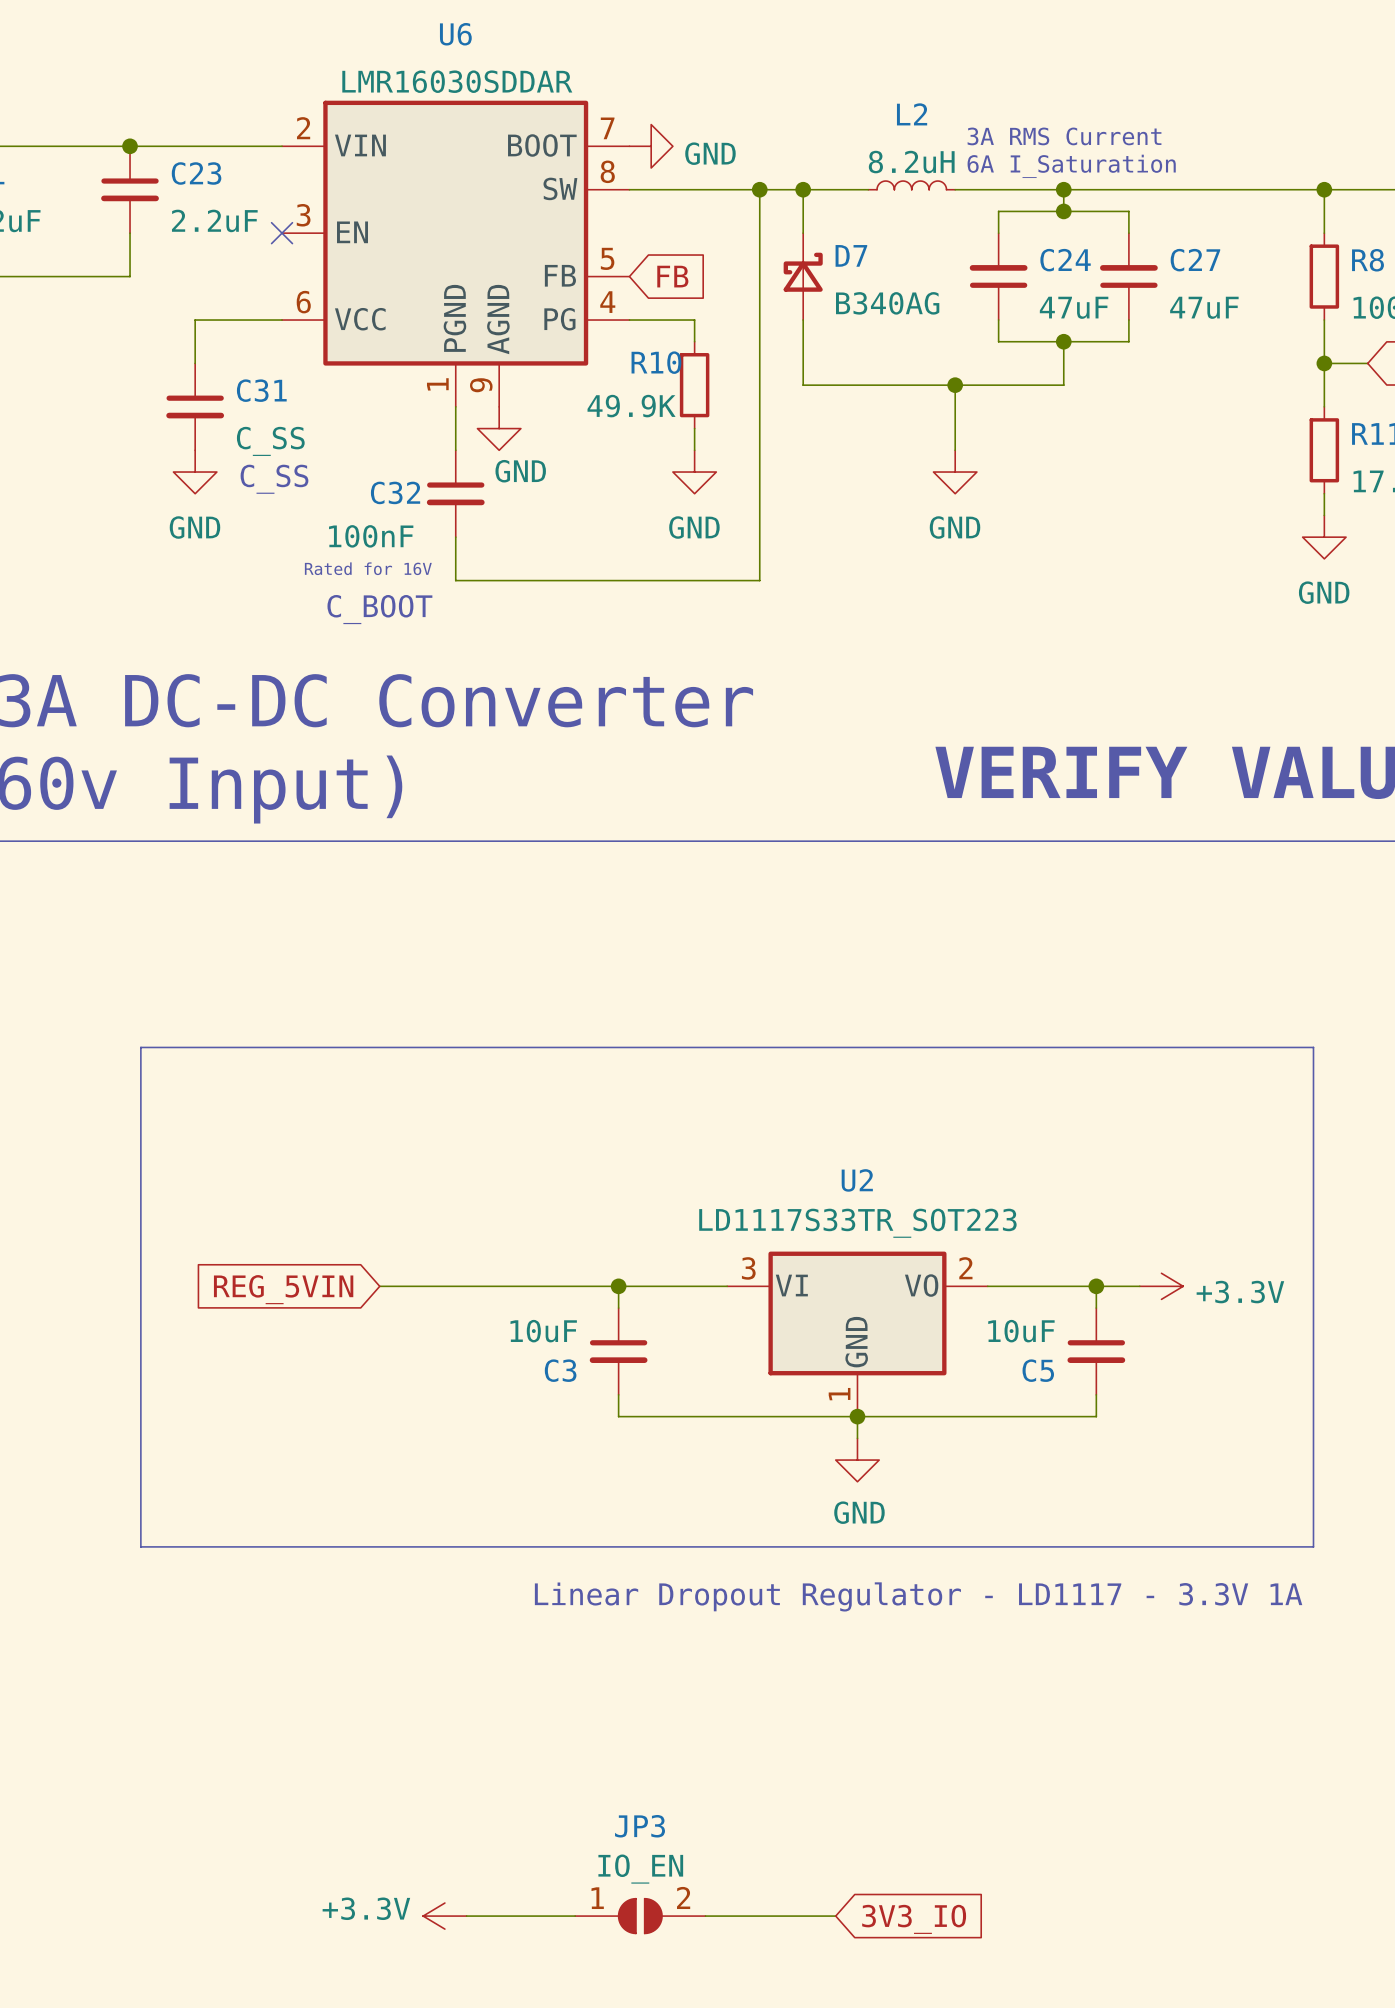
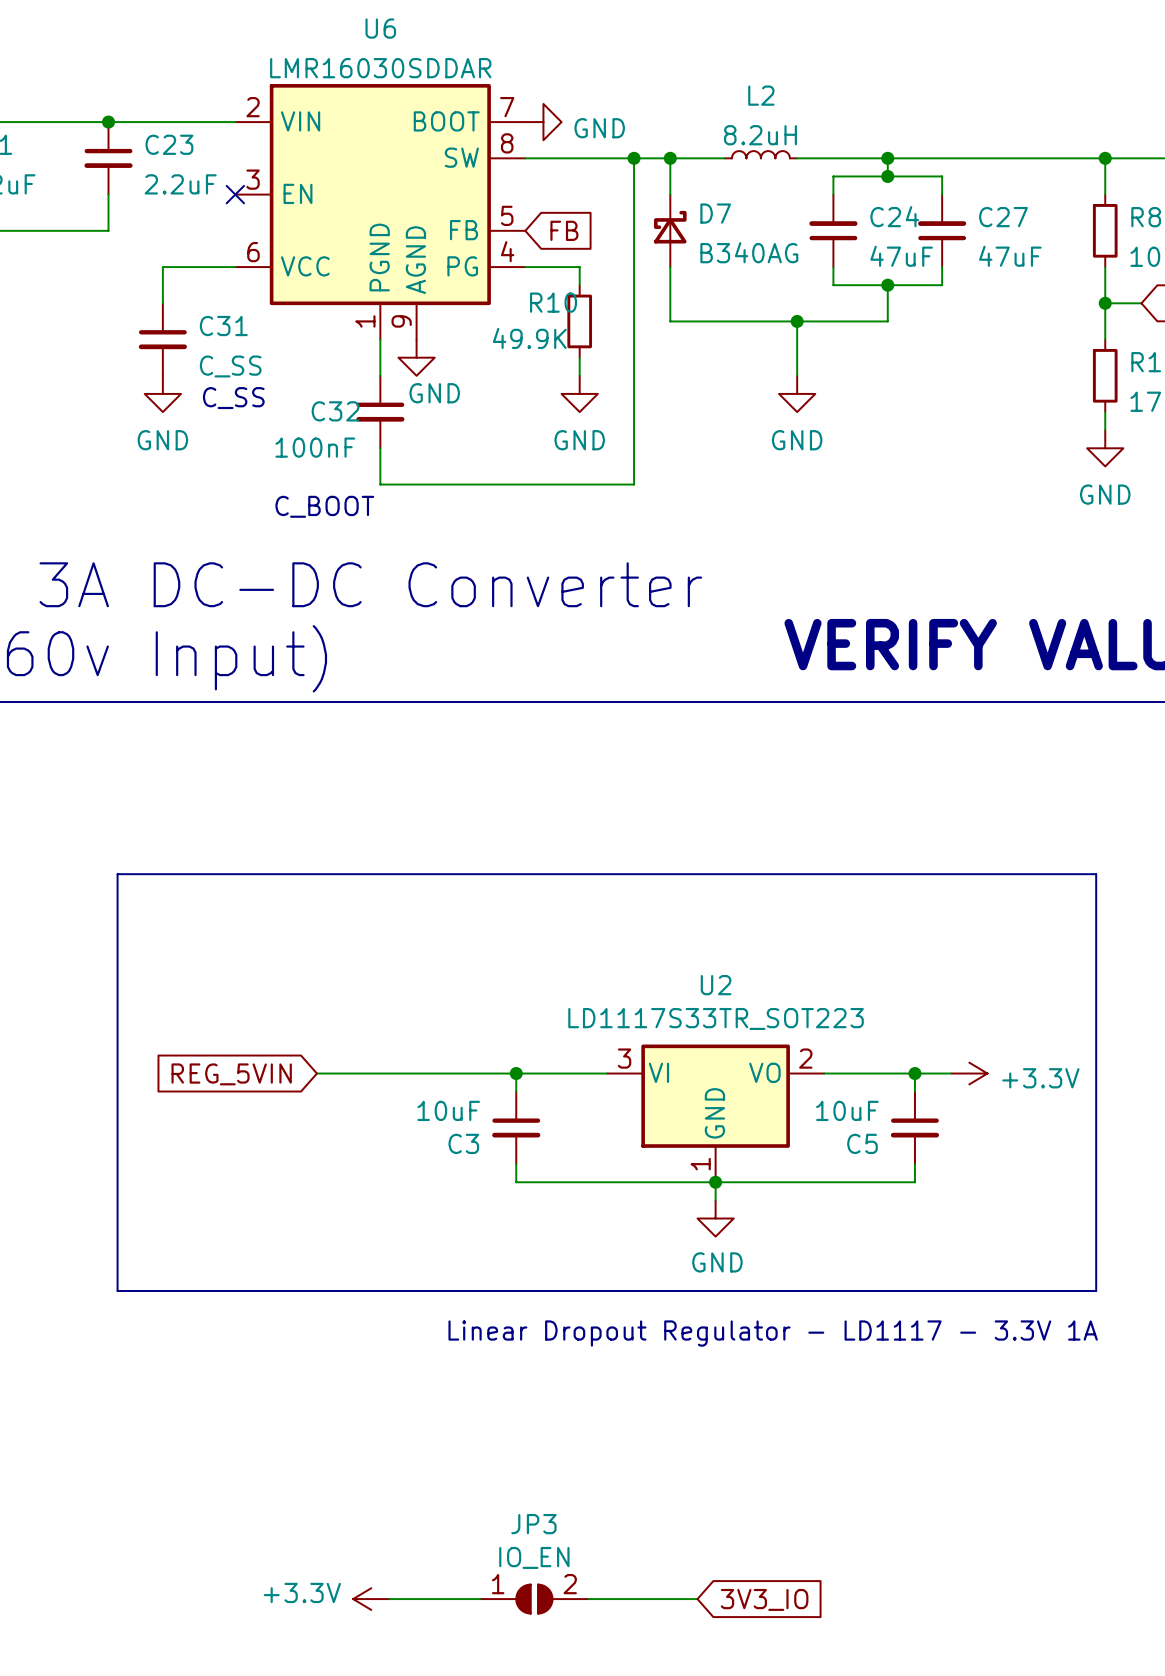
text: 3A RMS Current (1064, 136) -> none
text: 6A I_Saturation (1071, 166) -> none
text: Rated for 16V (368, 568) -> none

